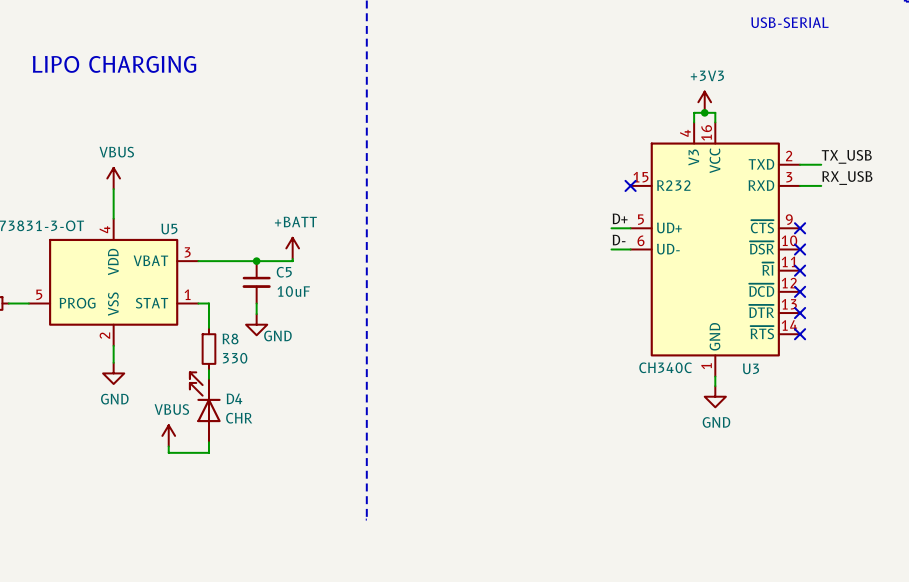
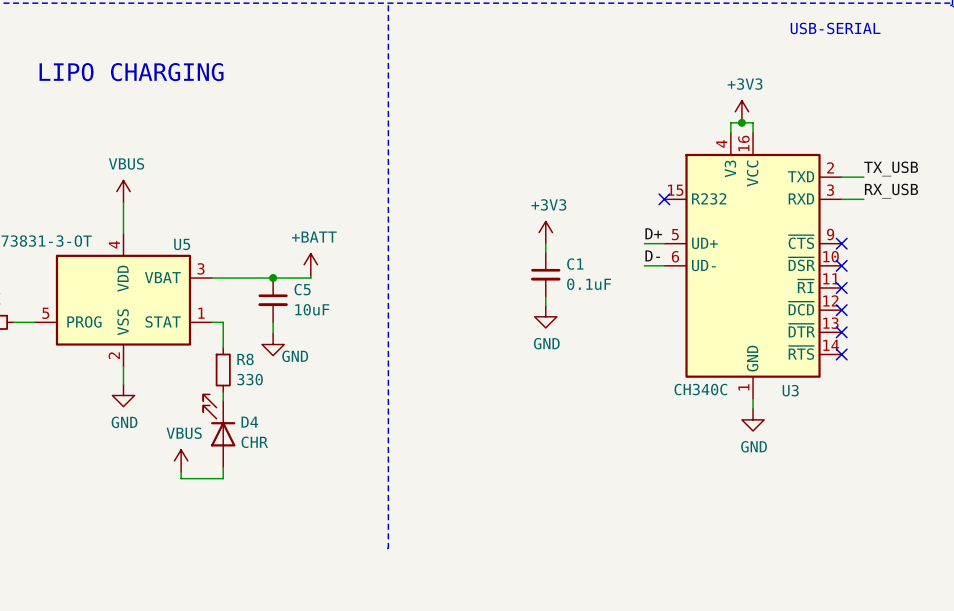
power symbol: none -> +3V3 (545, 232)
wire: none -> (545, 243) (545, 252)
C1: none -> 0.1uF (545, 274)
wire: none -> (545, 296) (545, 305)
power symbol: none -> GND (545, 316)

